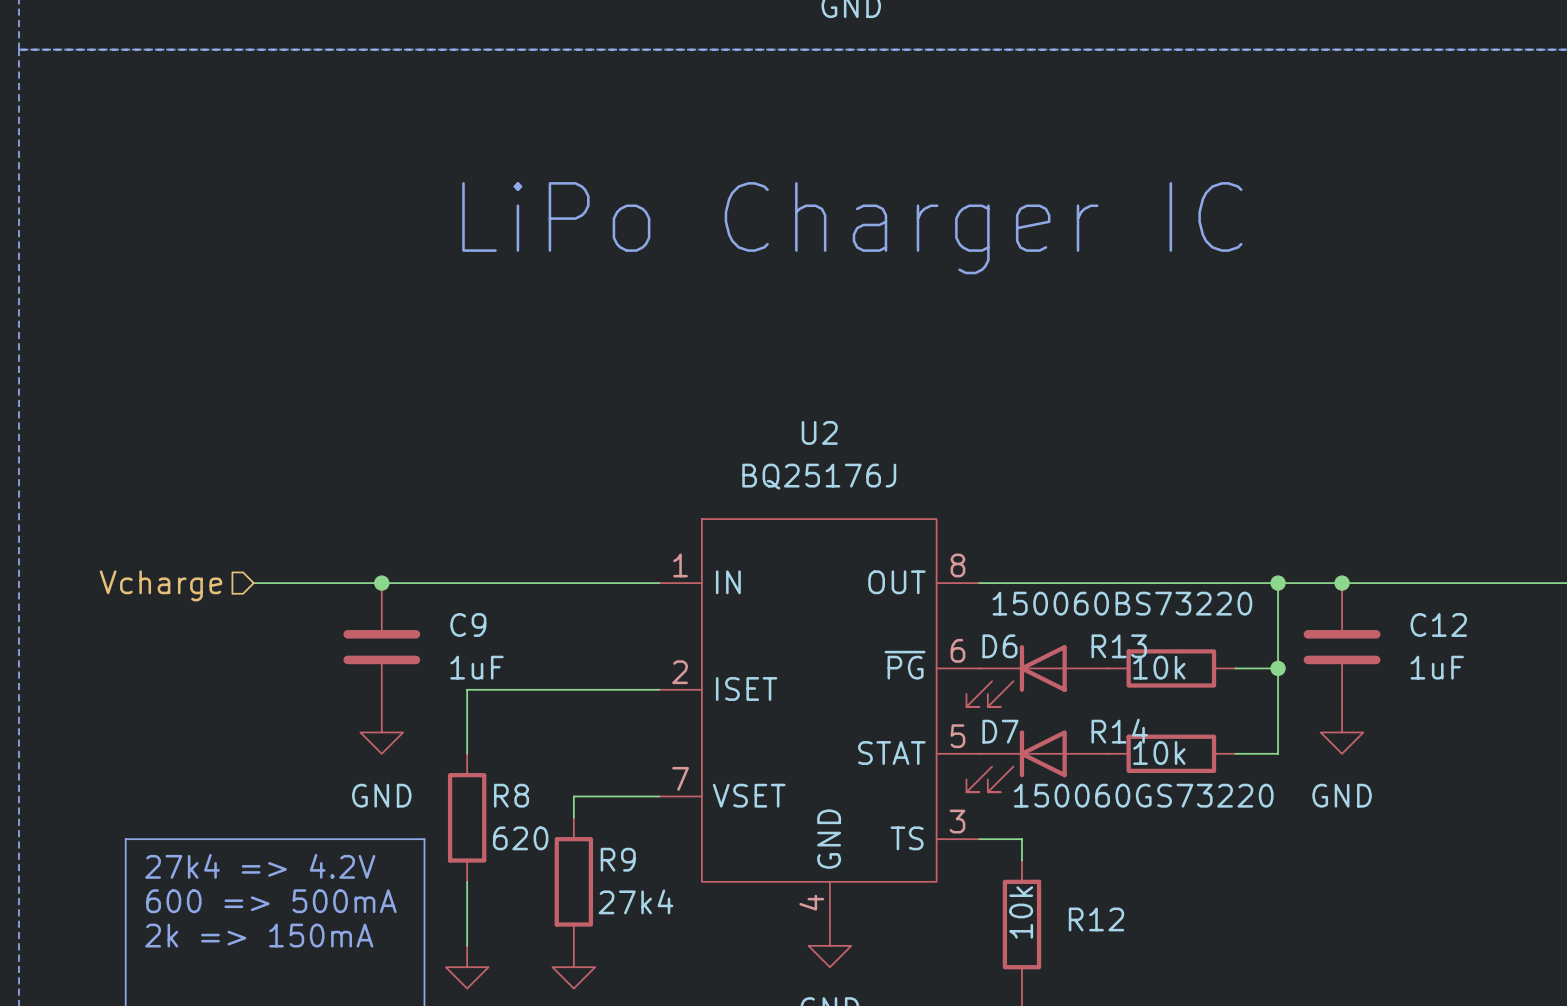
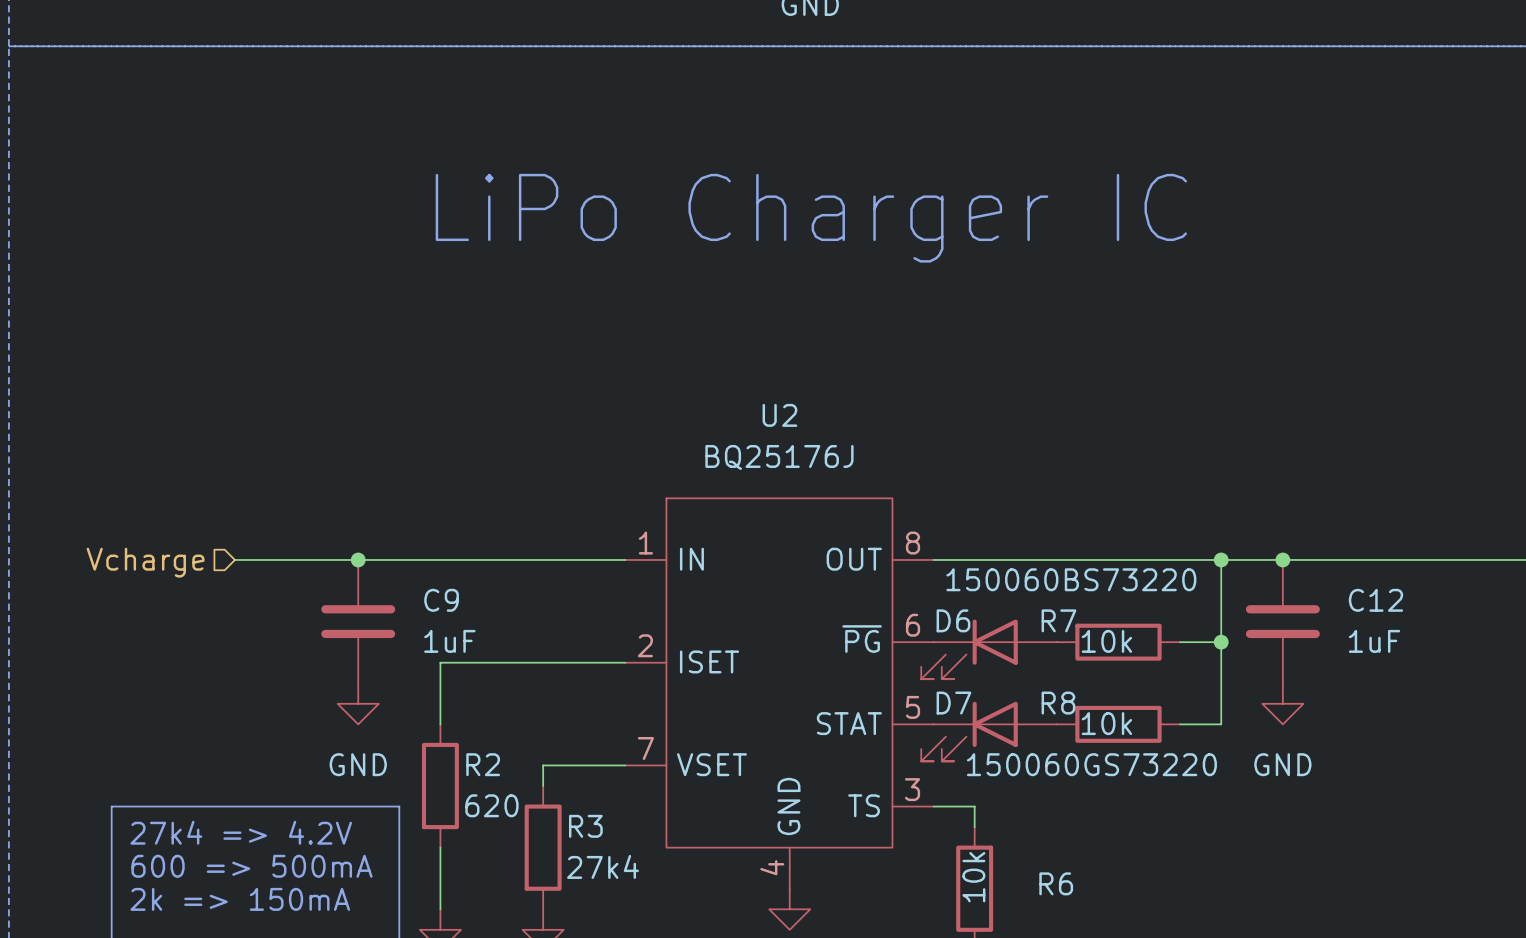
R13 name: R13 (1119, 646) -> R7 (1058, 620)
R14 name: R14 (1119, 731) -> R8 (1058, 703)
R8 name: R8 (511, 795) -> R2 (483, 764)
R9 name: R9 (618, 859) -> R3 (585, 826)
R12 name: R12 (1096, 919) -> R6 (1056, 883)

